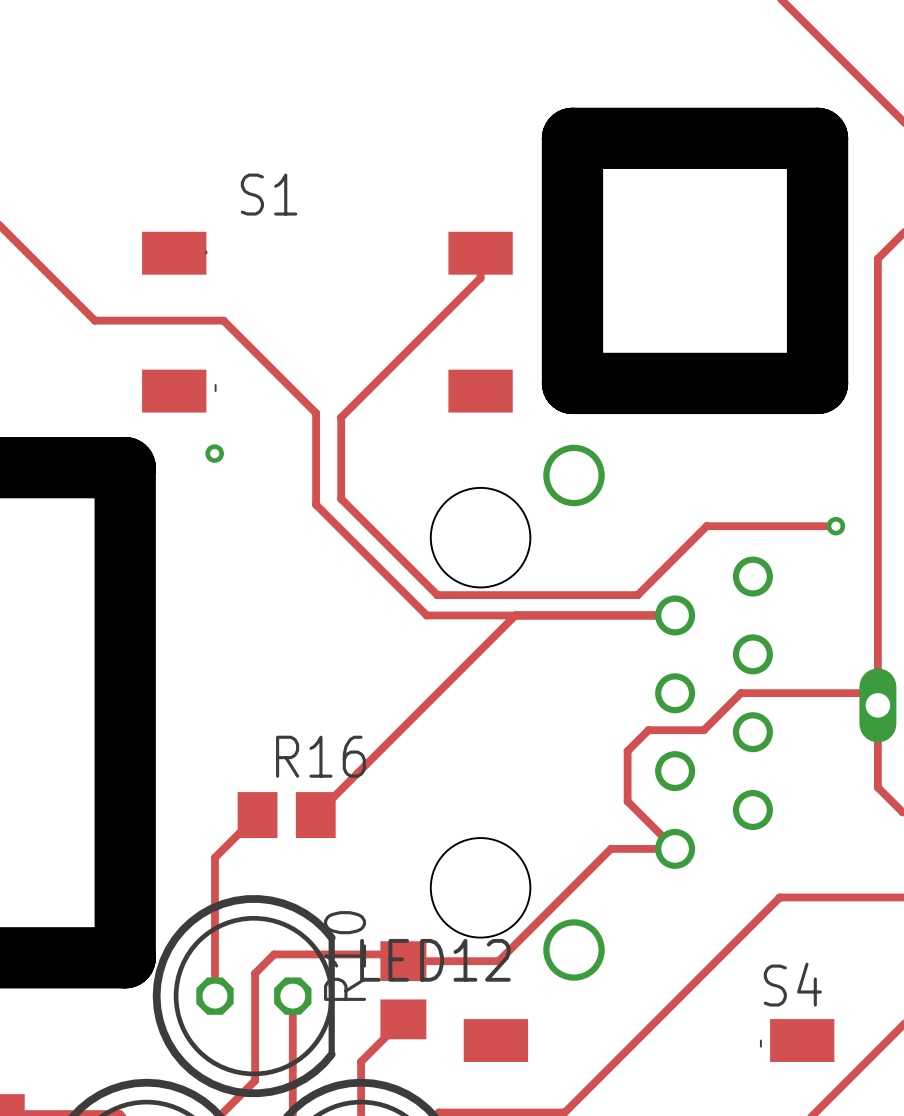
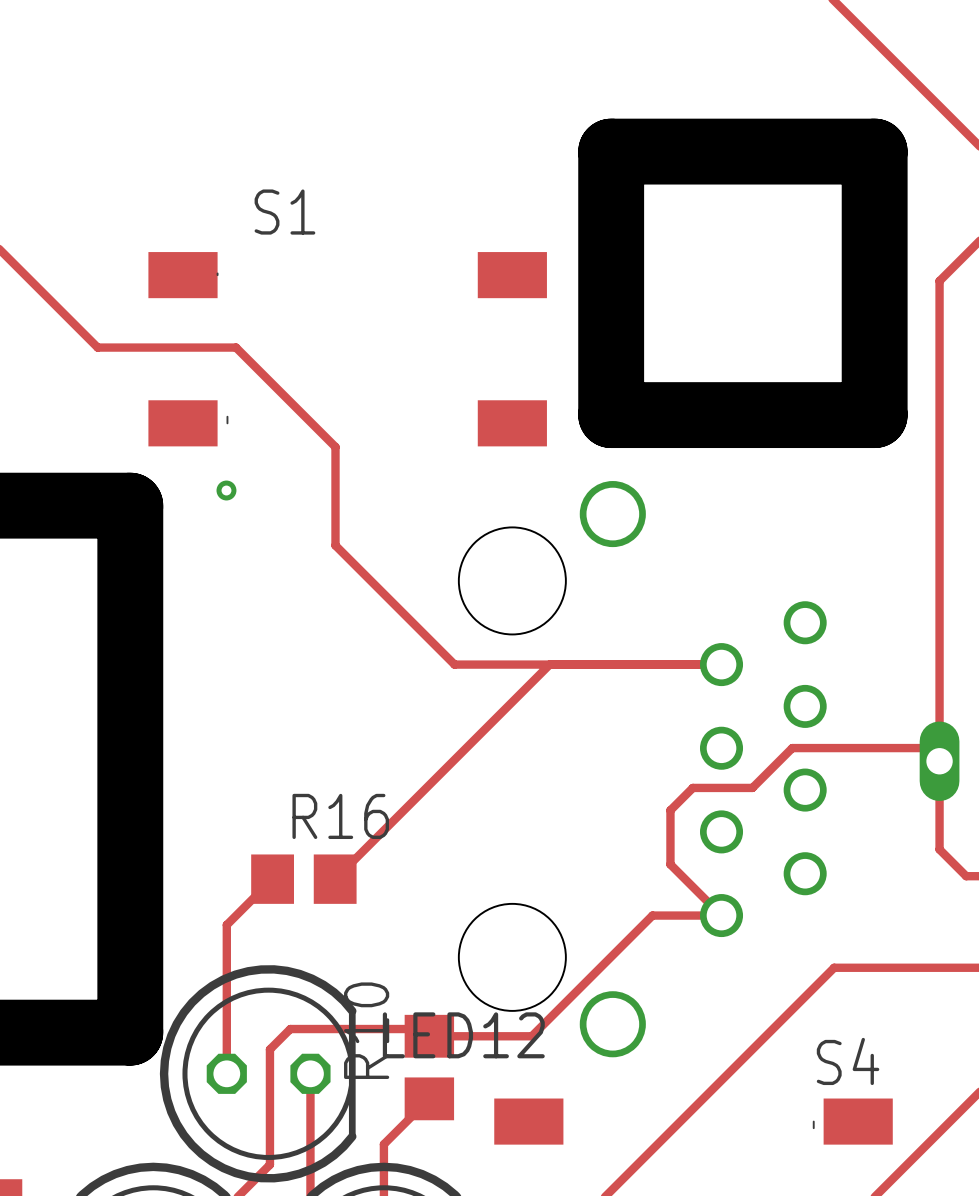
track: (480, 253) (480, 278) (341, 417) (341, 498) (437, 595) (637, 595) (706, 526) (835, 526) -> none
via: (835, 526) -> none

